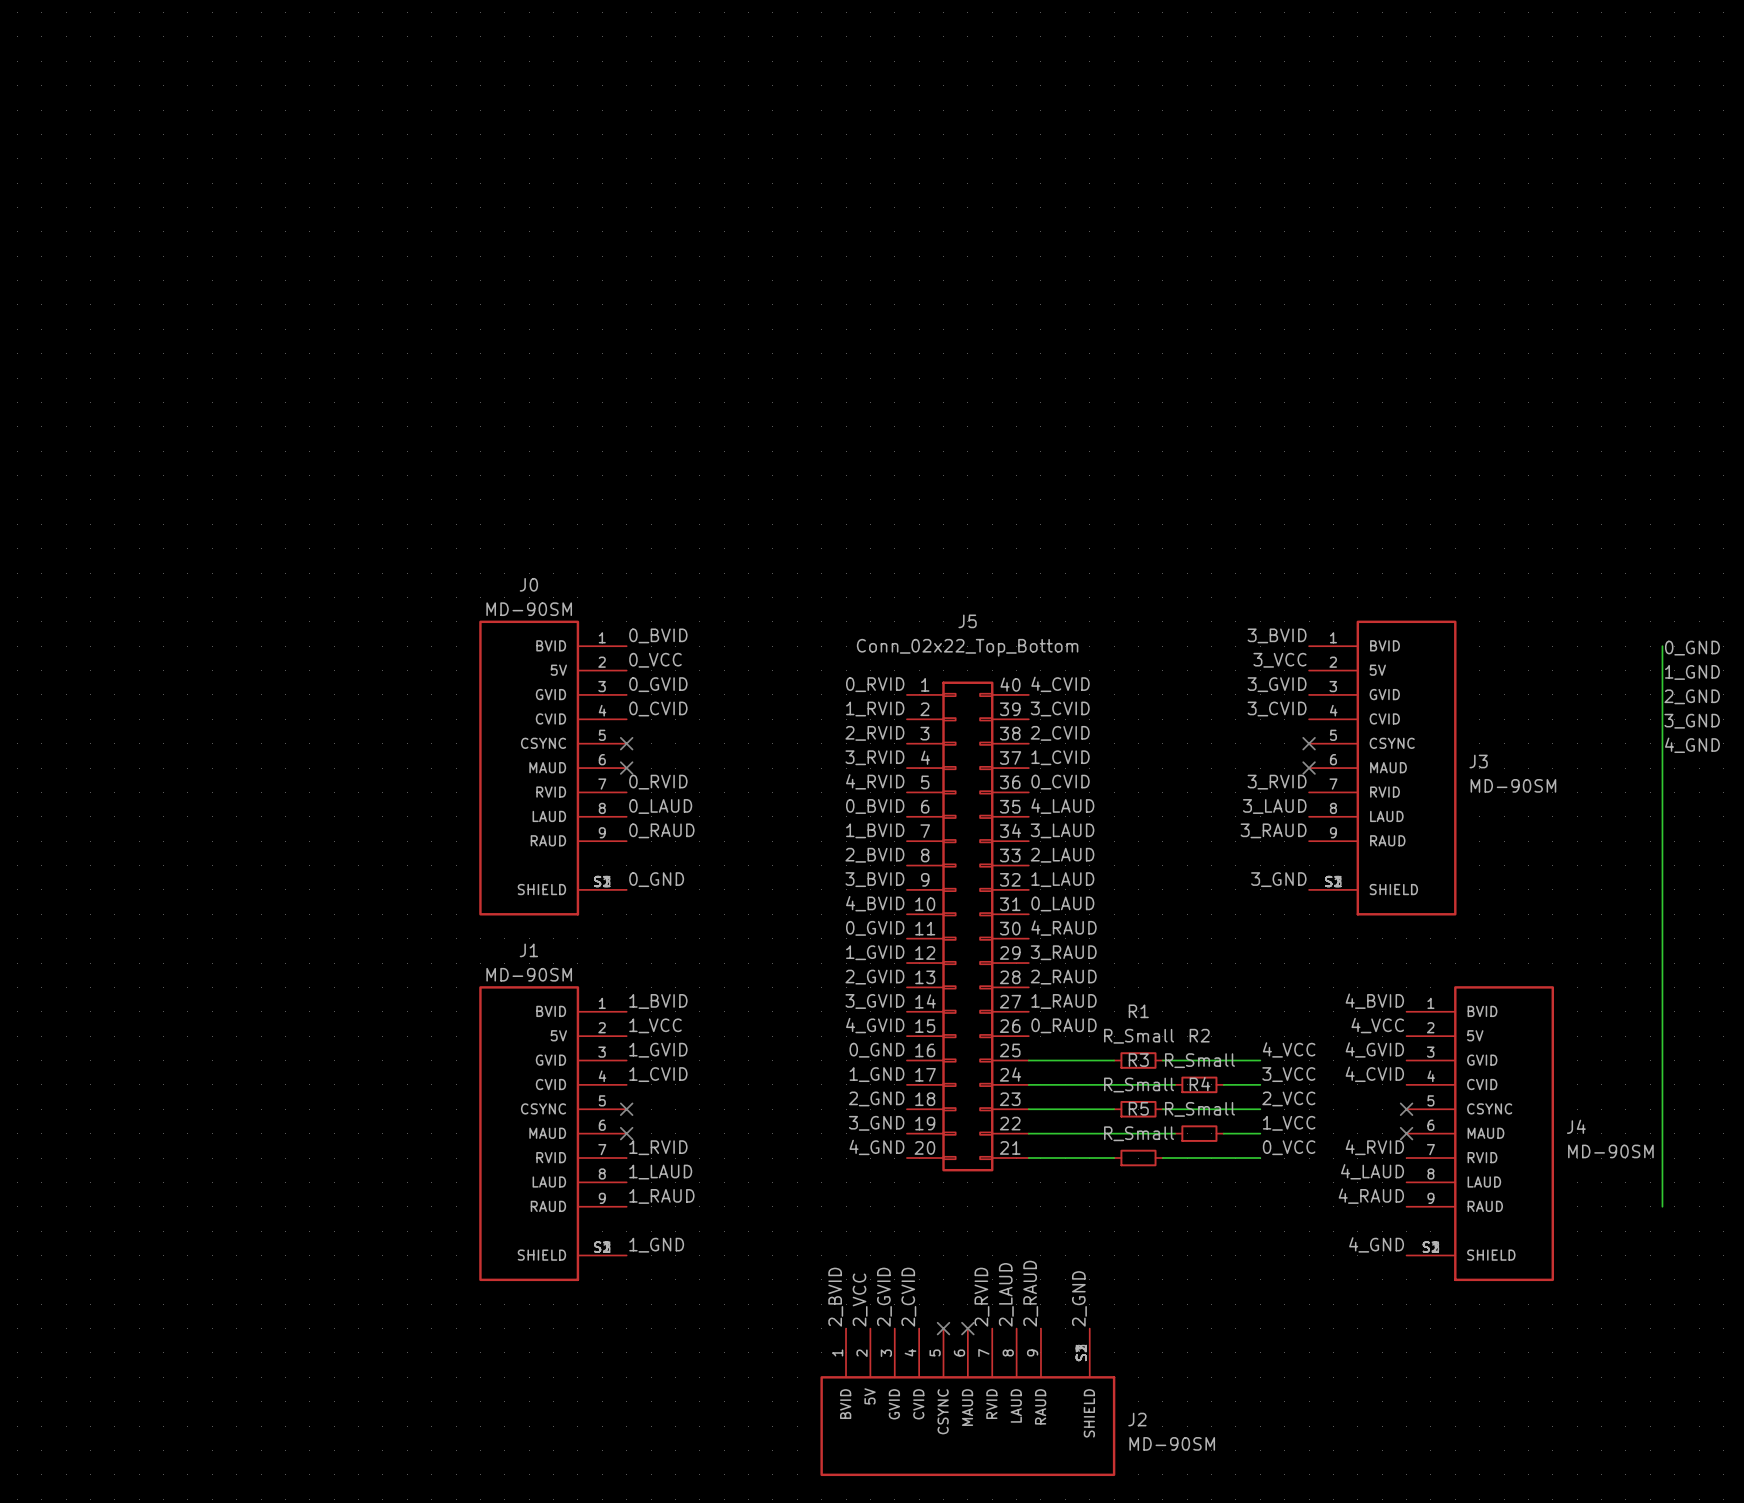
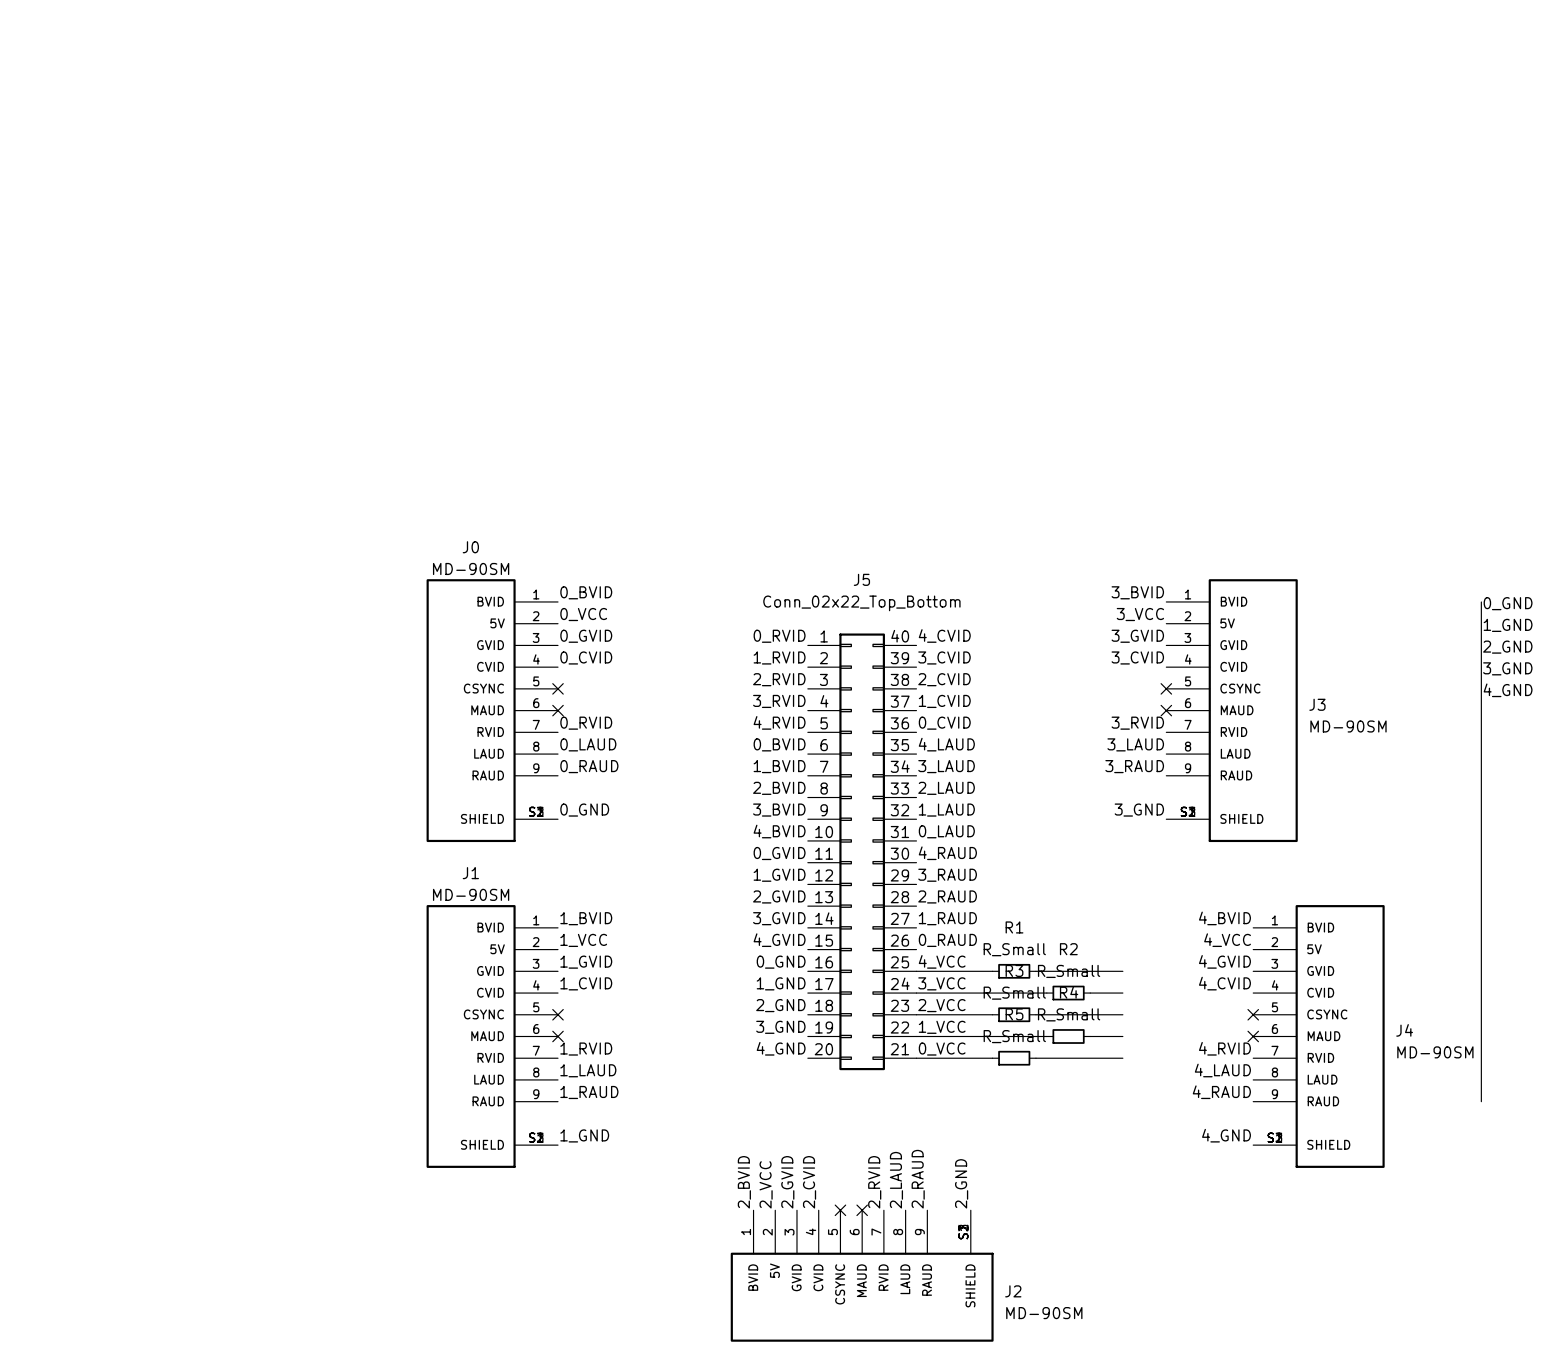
label position: 4_VCC (1289, 1049) -> 4_VCC (942, 961)
label position: 3_VCC (1288, 1074) -> 3_VCC (941, 983)
label position: 2_VCC (1288, 1098) -> 2_VCC (941, 1005)
label position: 1_VCC (1289, 1123) -> 1_VCC (942, 1027)
label position: 0_VCC (1289, 1147) -> 0_VCC (942, 1049)

